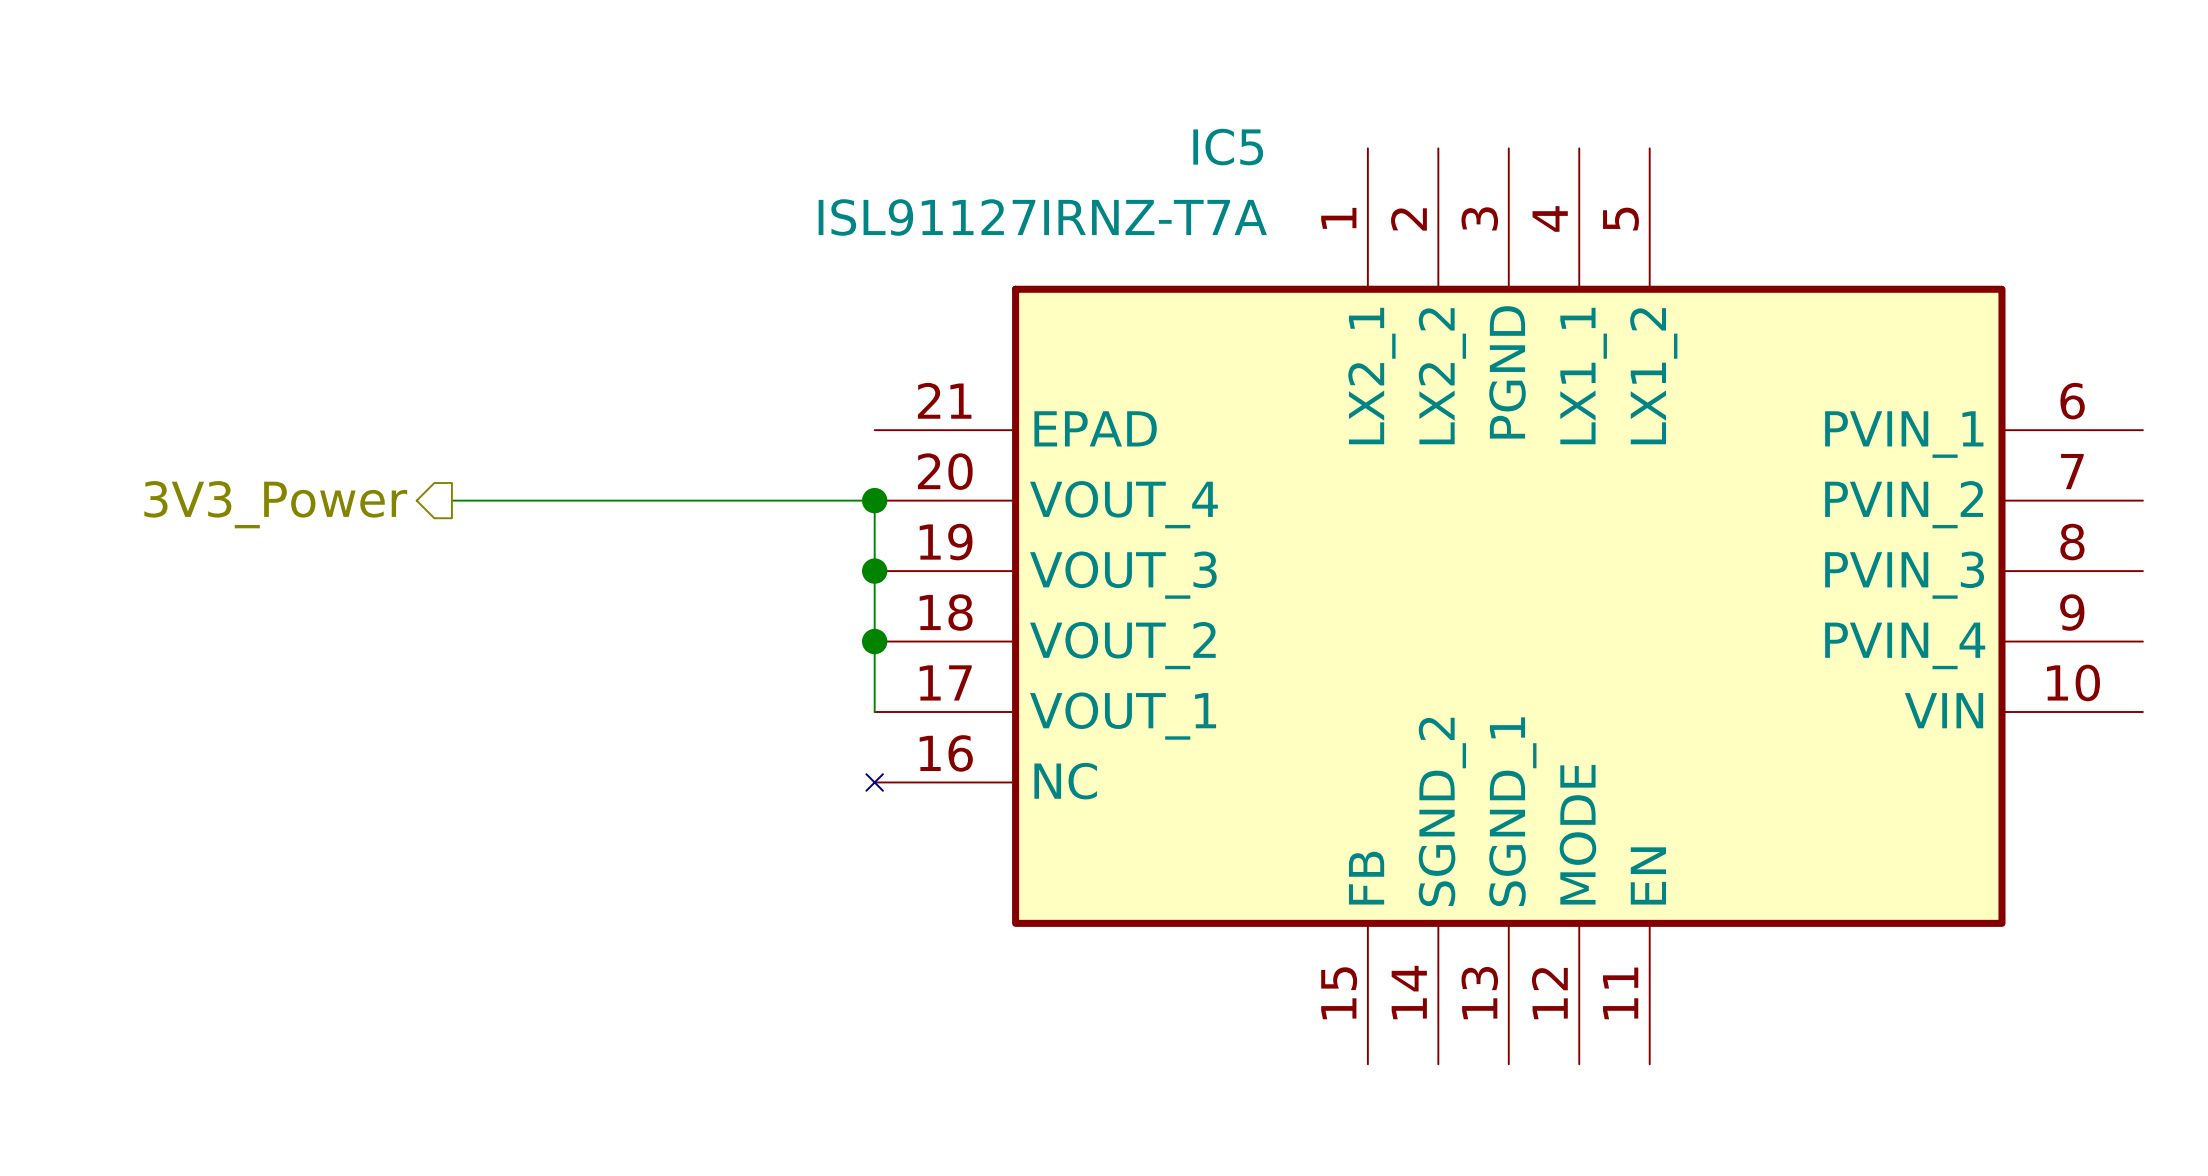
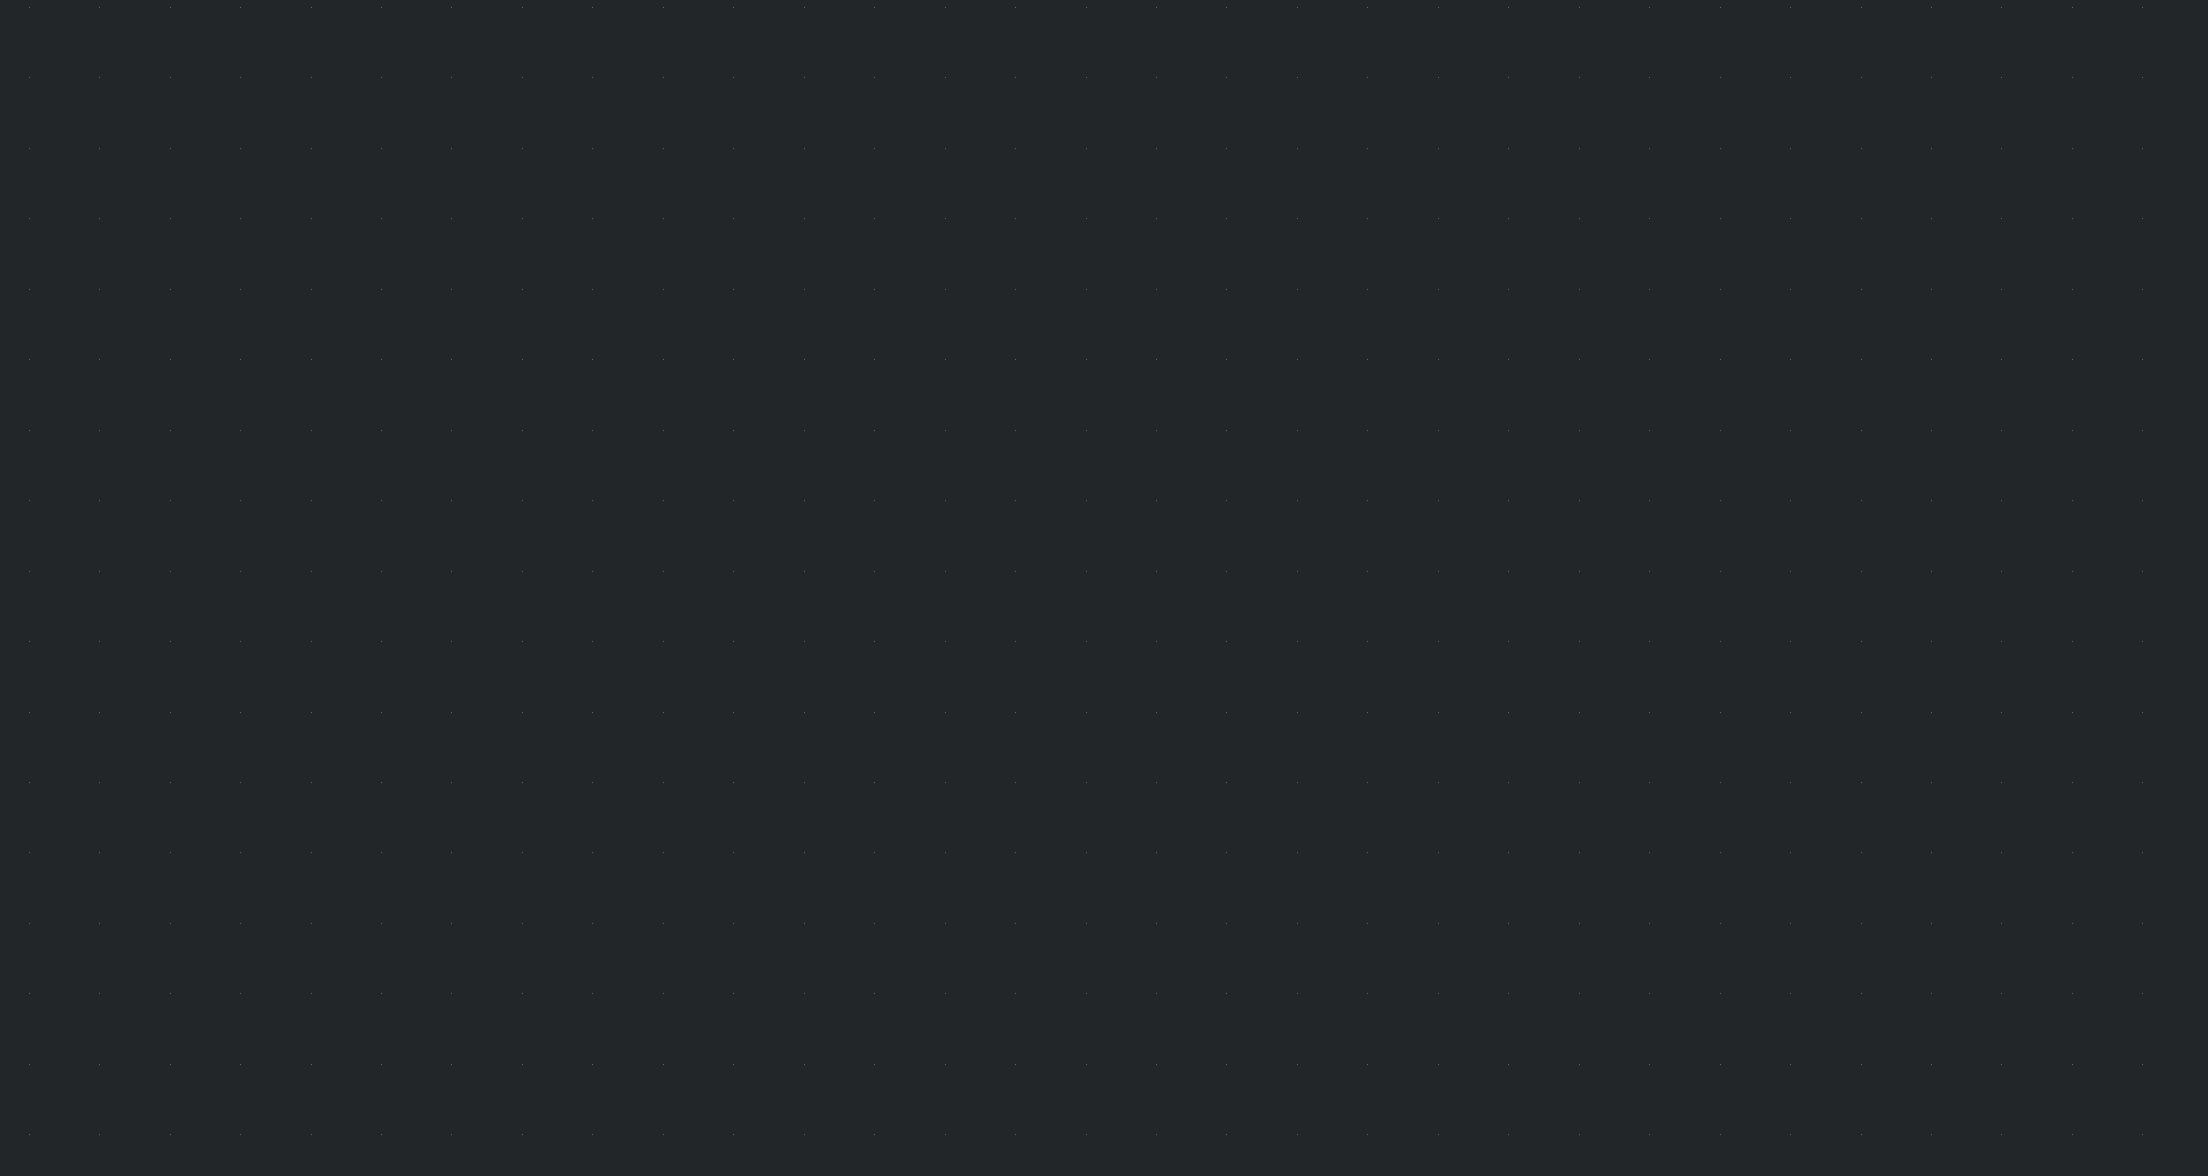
wire: (451, 500) (874, 500) (874, 712) -> none
junction: (874, 500) -> none
hierarchical label: 3V3_Power (275, 504) -> none
junction: (874, 571) -> none
IC5: ISL91127IRNZ-T7A (1504, 606) -> none
junction: (874, 641) -> none

